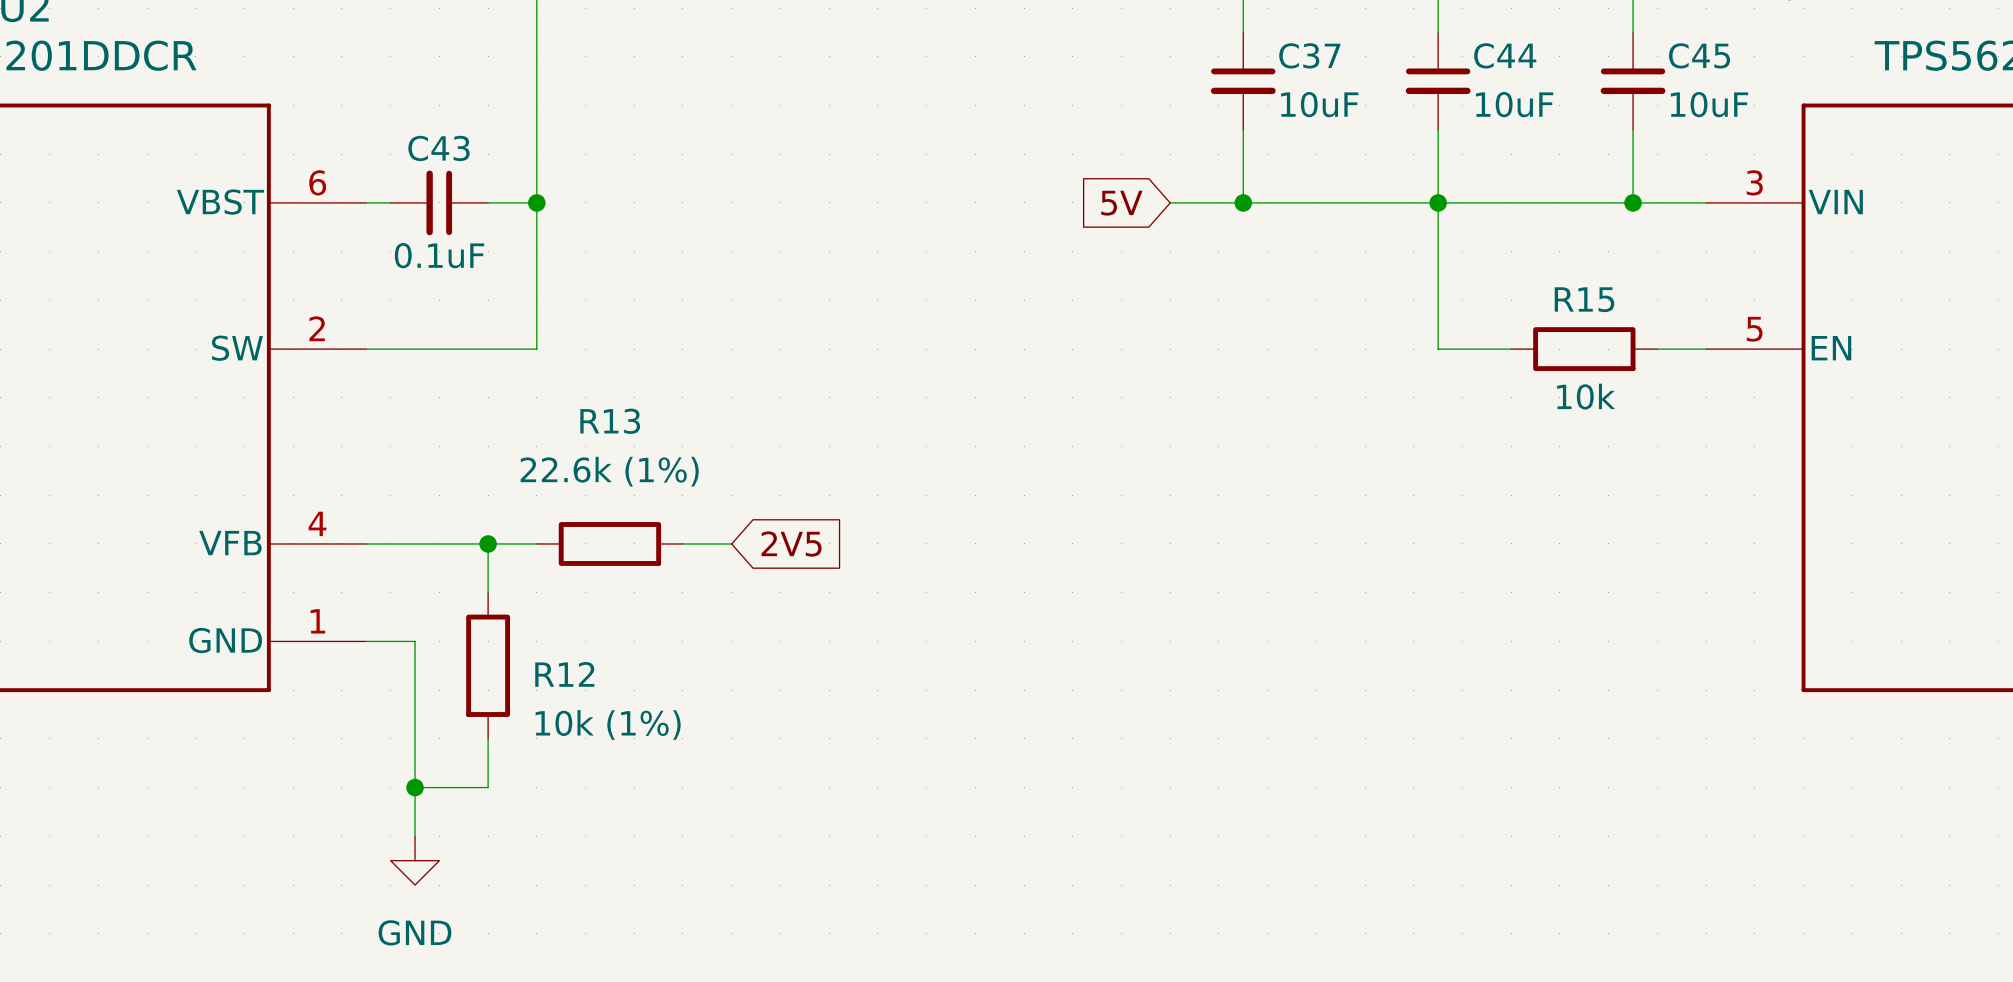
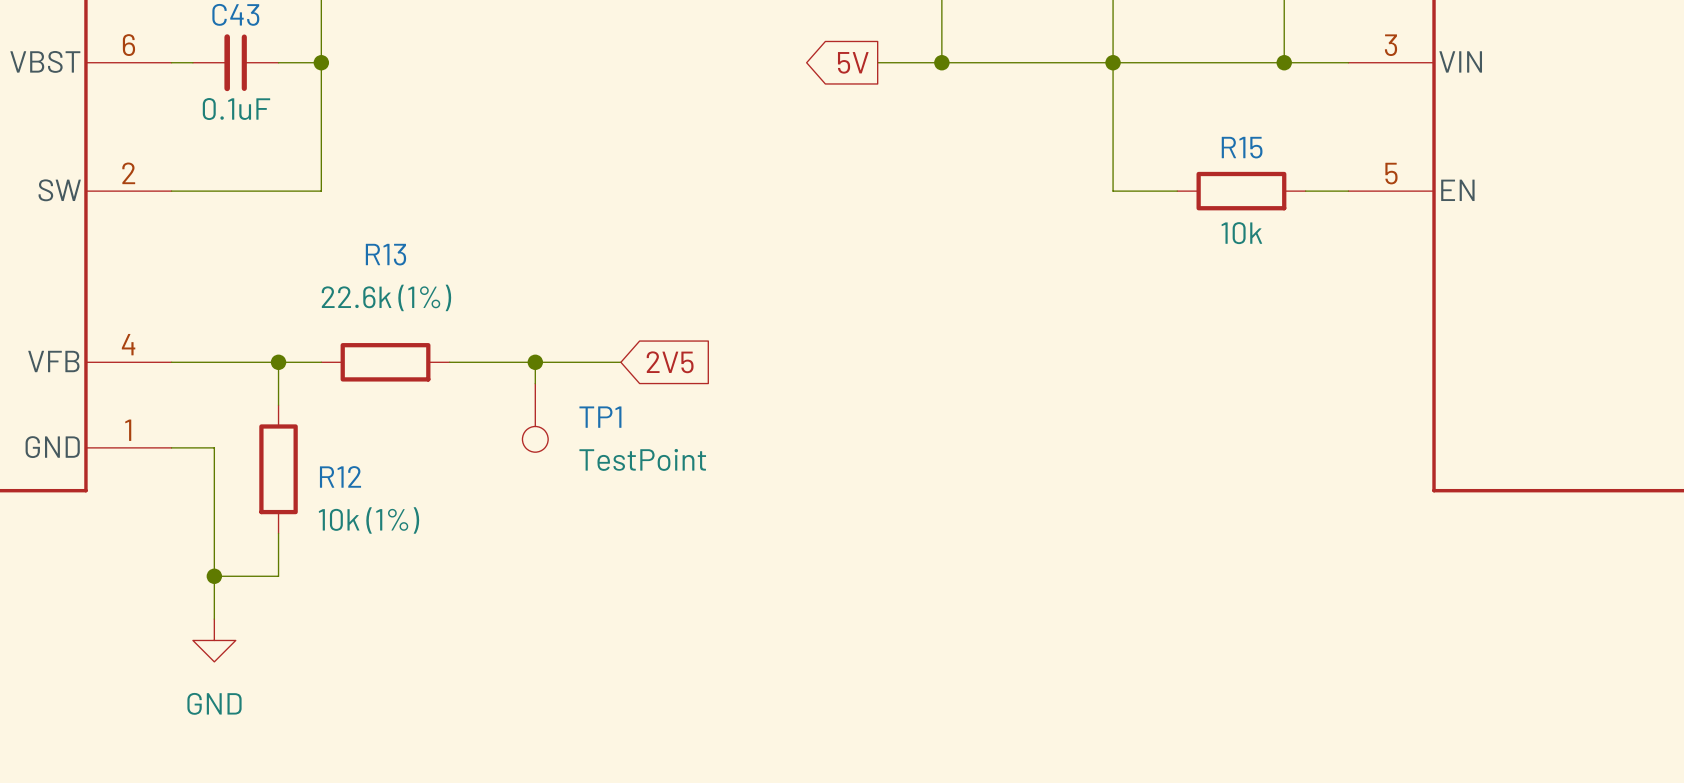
global label shape: input (1121, 203) -> output (853, 62)
wire: none -> (492, 362) (620, 362)
wire: none -> (535, 362) (535, 383)
junction: none -> (535, 362)
global label position: 2V5 (791, 544) -> 2V5 (670, 362)
TP1: none -> TestPoint (535, 417)

